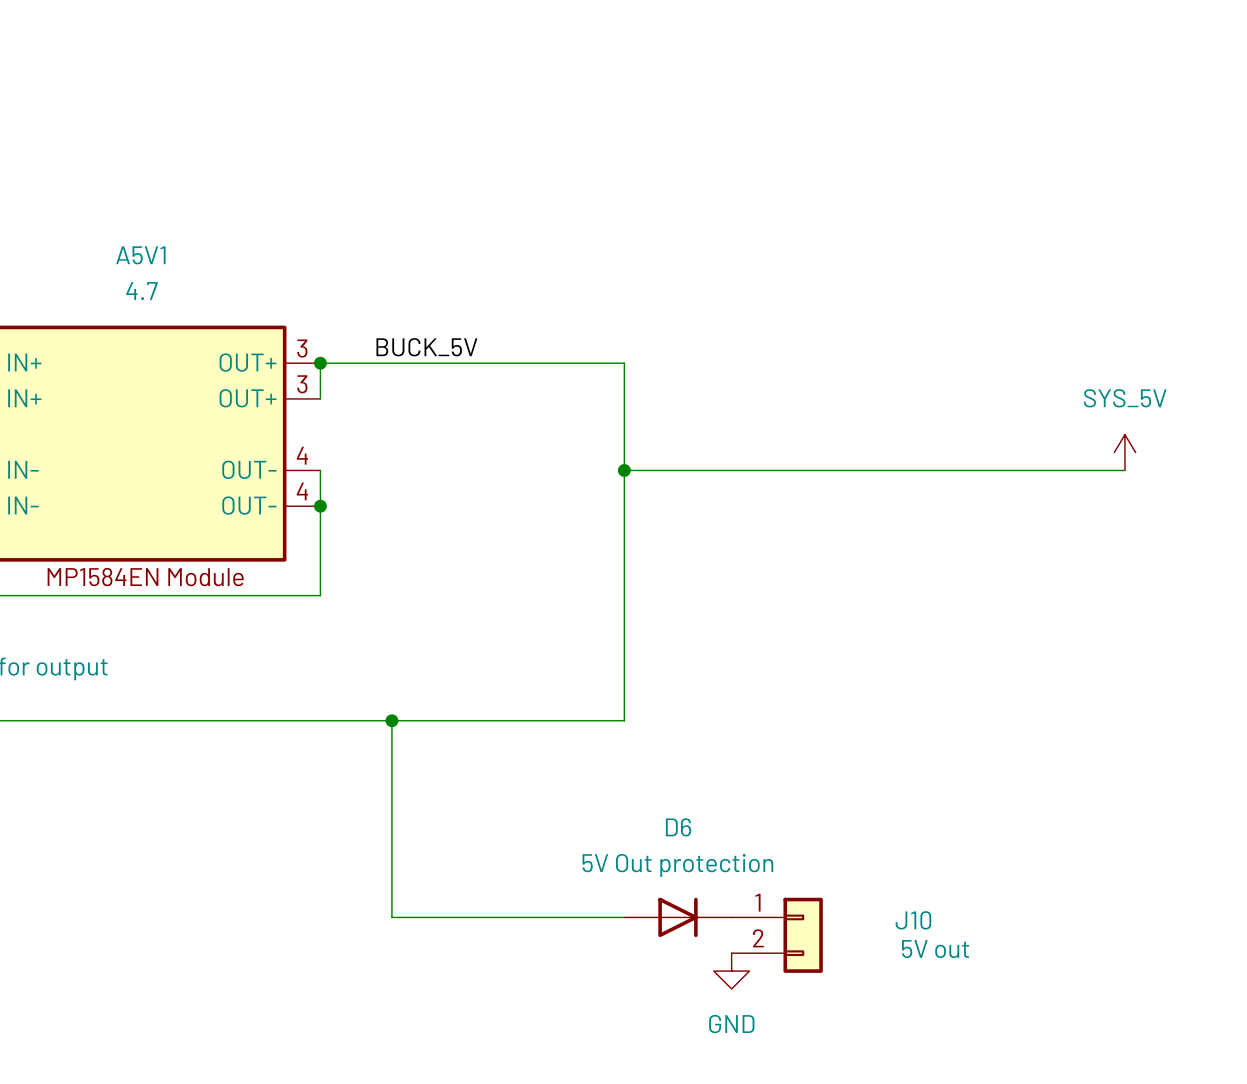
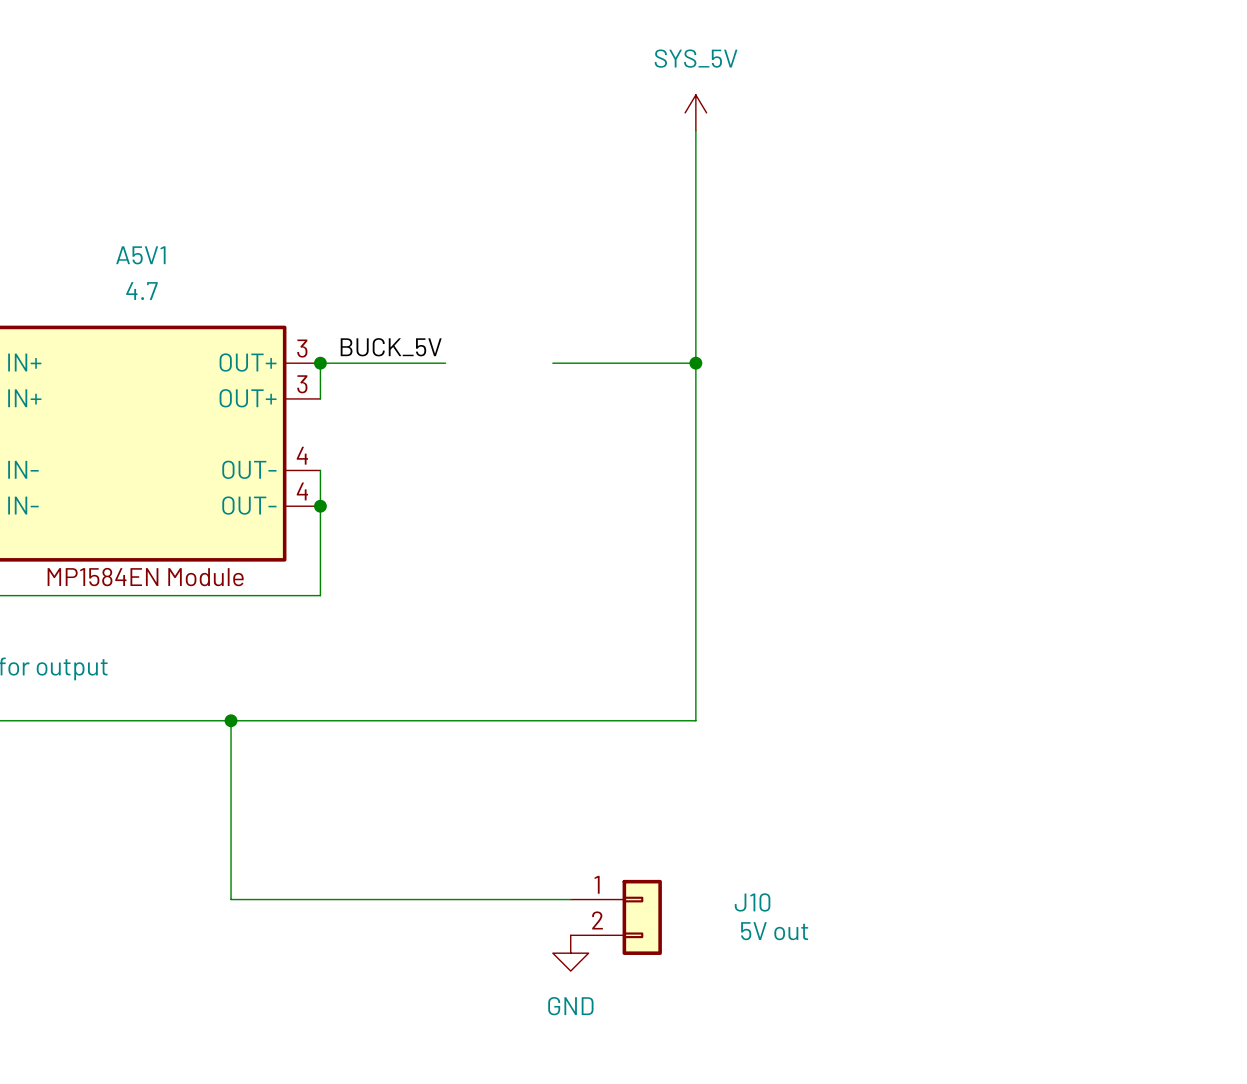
power symbol: none -> SYS_5V (695, 112)
label position: BUCK_5V (426, 347) -> BUCK_5V (391, 347)
wire: (445, 363) (552, 363) -> none
wire: (624, 363) (624, 720) -> (695, 130) (695, 720) (624, 720)
wire: none -> (624, 363) (695, 363)
junction: none -> (695, 363)
power symbol: SYS_5V (1124, 452) -> none
wire: (624, 470) (1124, 470) -> none
junction: (624, 470) -> none
wire: none -> (231, 720) (231, 899) (570, 899)
junction: none -> (231, 720)
wire: (391, 720) (391, 917) (624, 917) -> none
junction: (391, 720) -> none
D6: 5V Out protection (677, 917) -> none
J10 position: (777, 935) -> (616, 917)
power symbol position: GND (731, 971) -> GND (570, 953)

